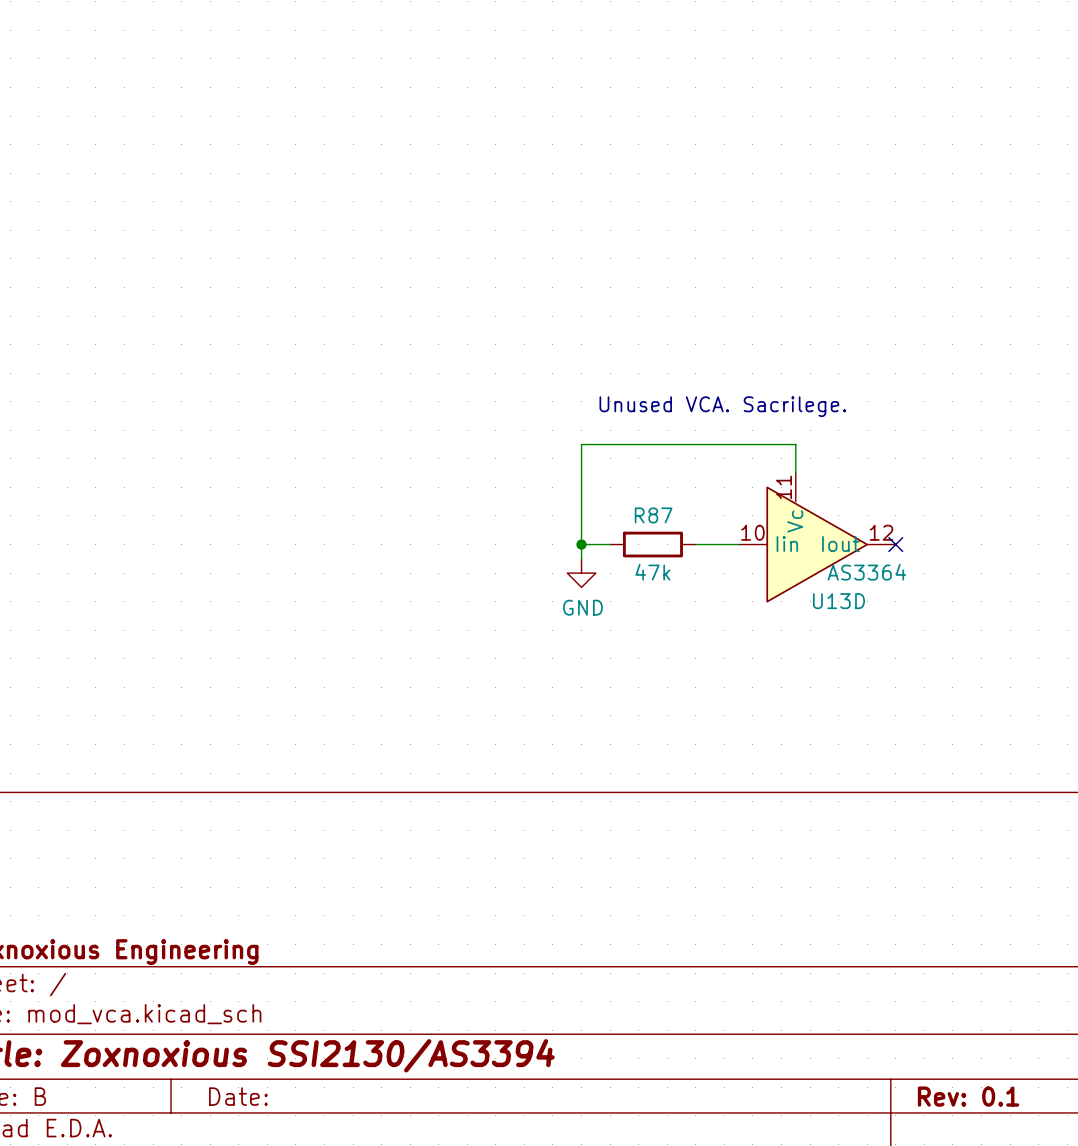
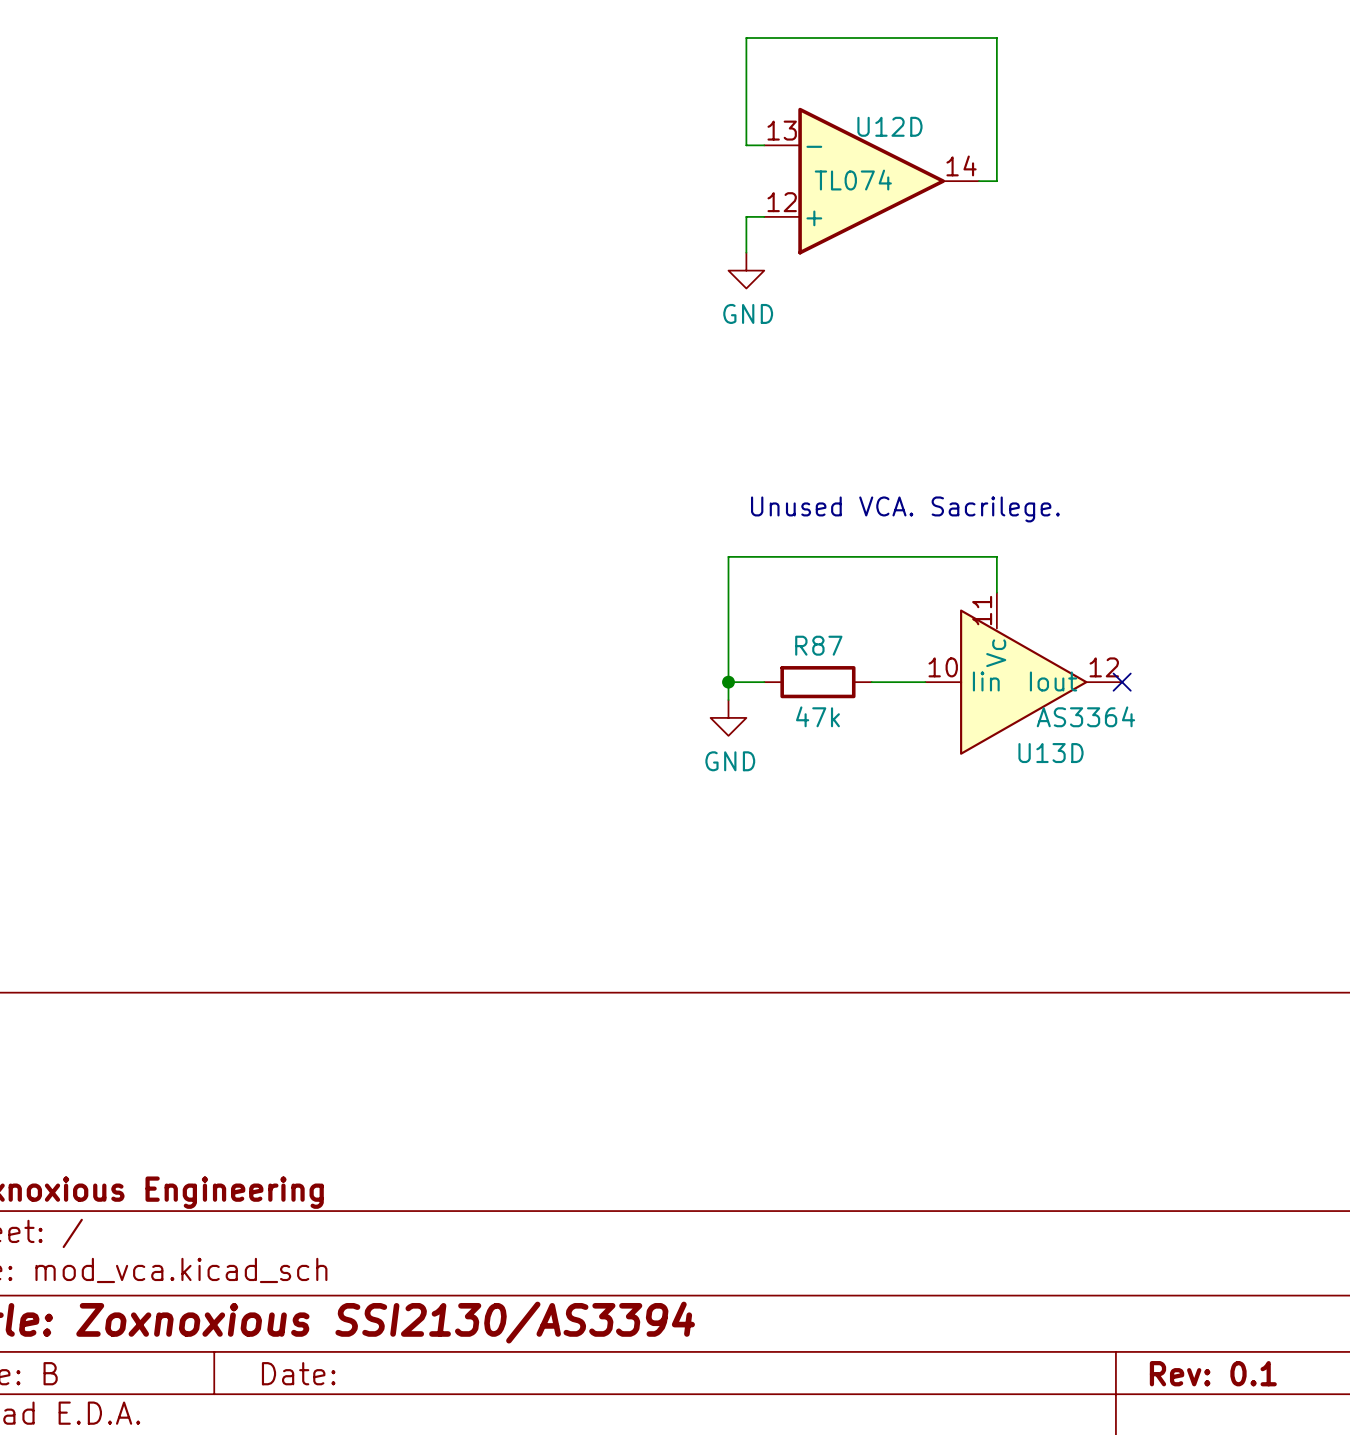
wire: none -> (764, 145) (746, 145) (746, 37) (996, 37) (996, 181) (979, 181)
U12D: none -> TL074 (871, 181)
wire: none -> (764, 216) (746, 216) (746, 252)
power symbol: none -> GND (746, 270)

